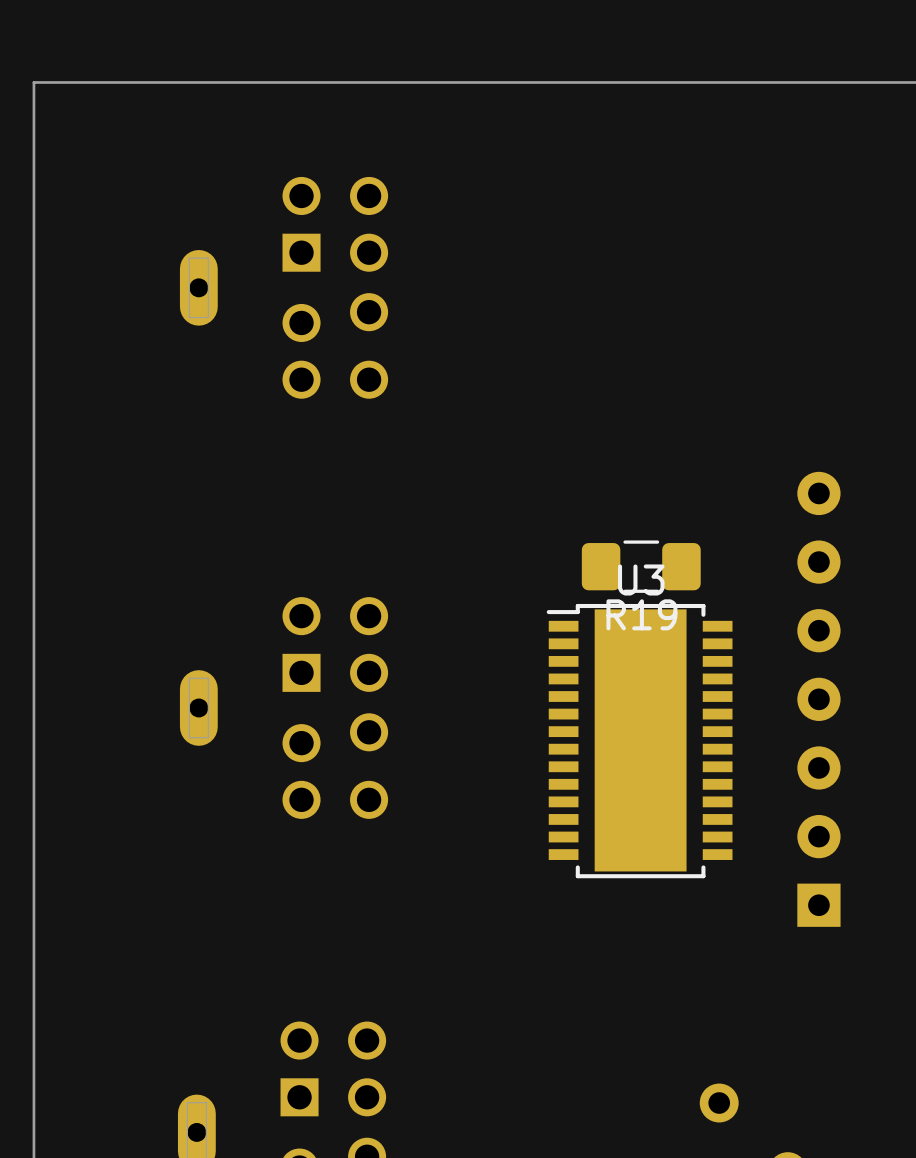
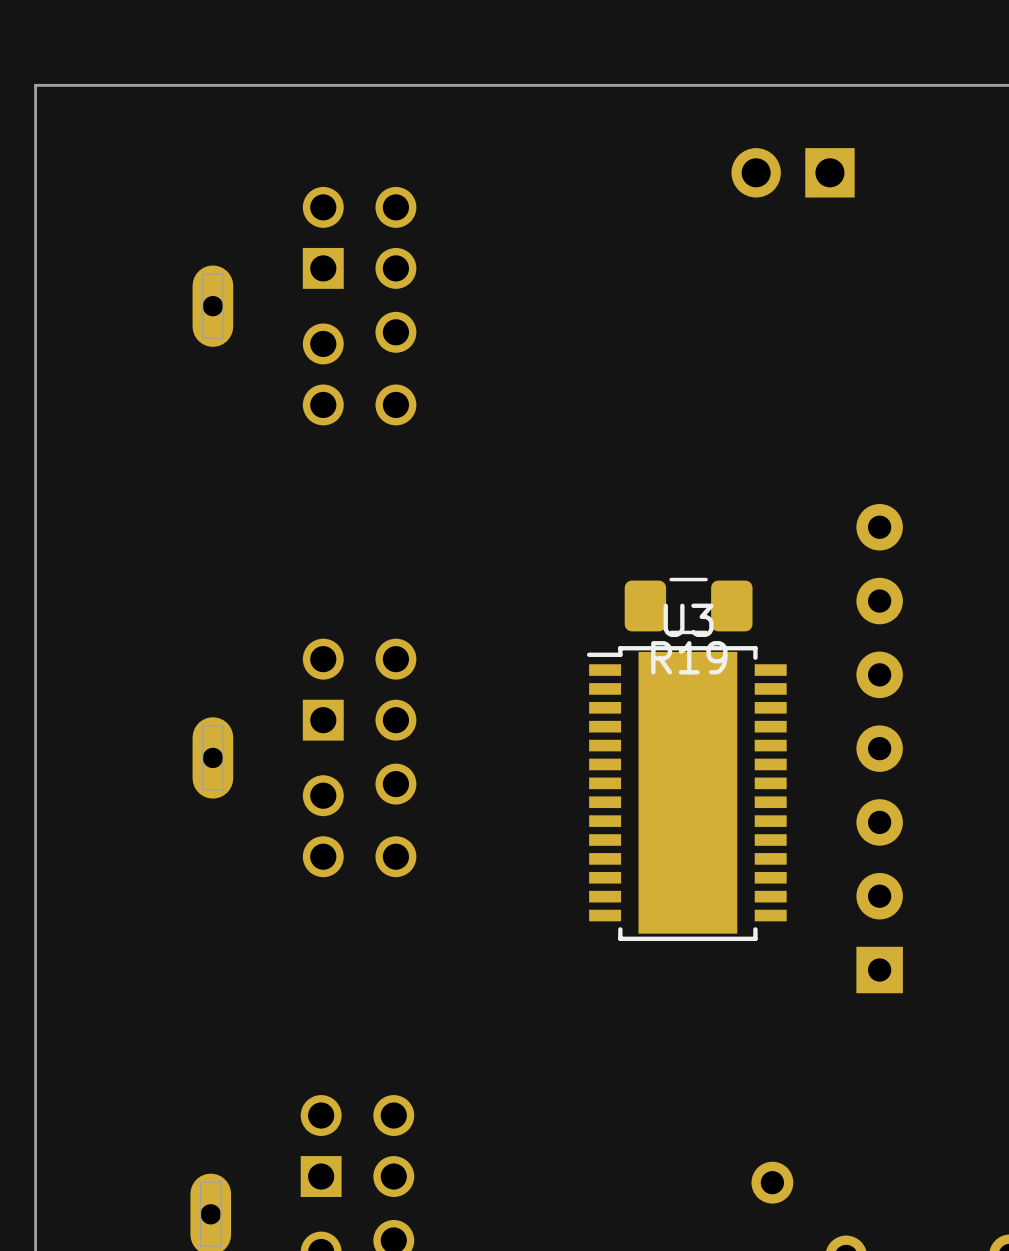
part: none -> (793, 172)

